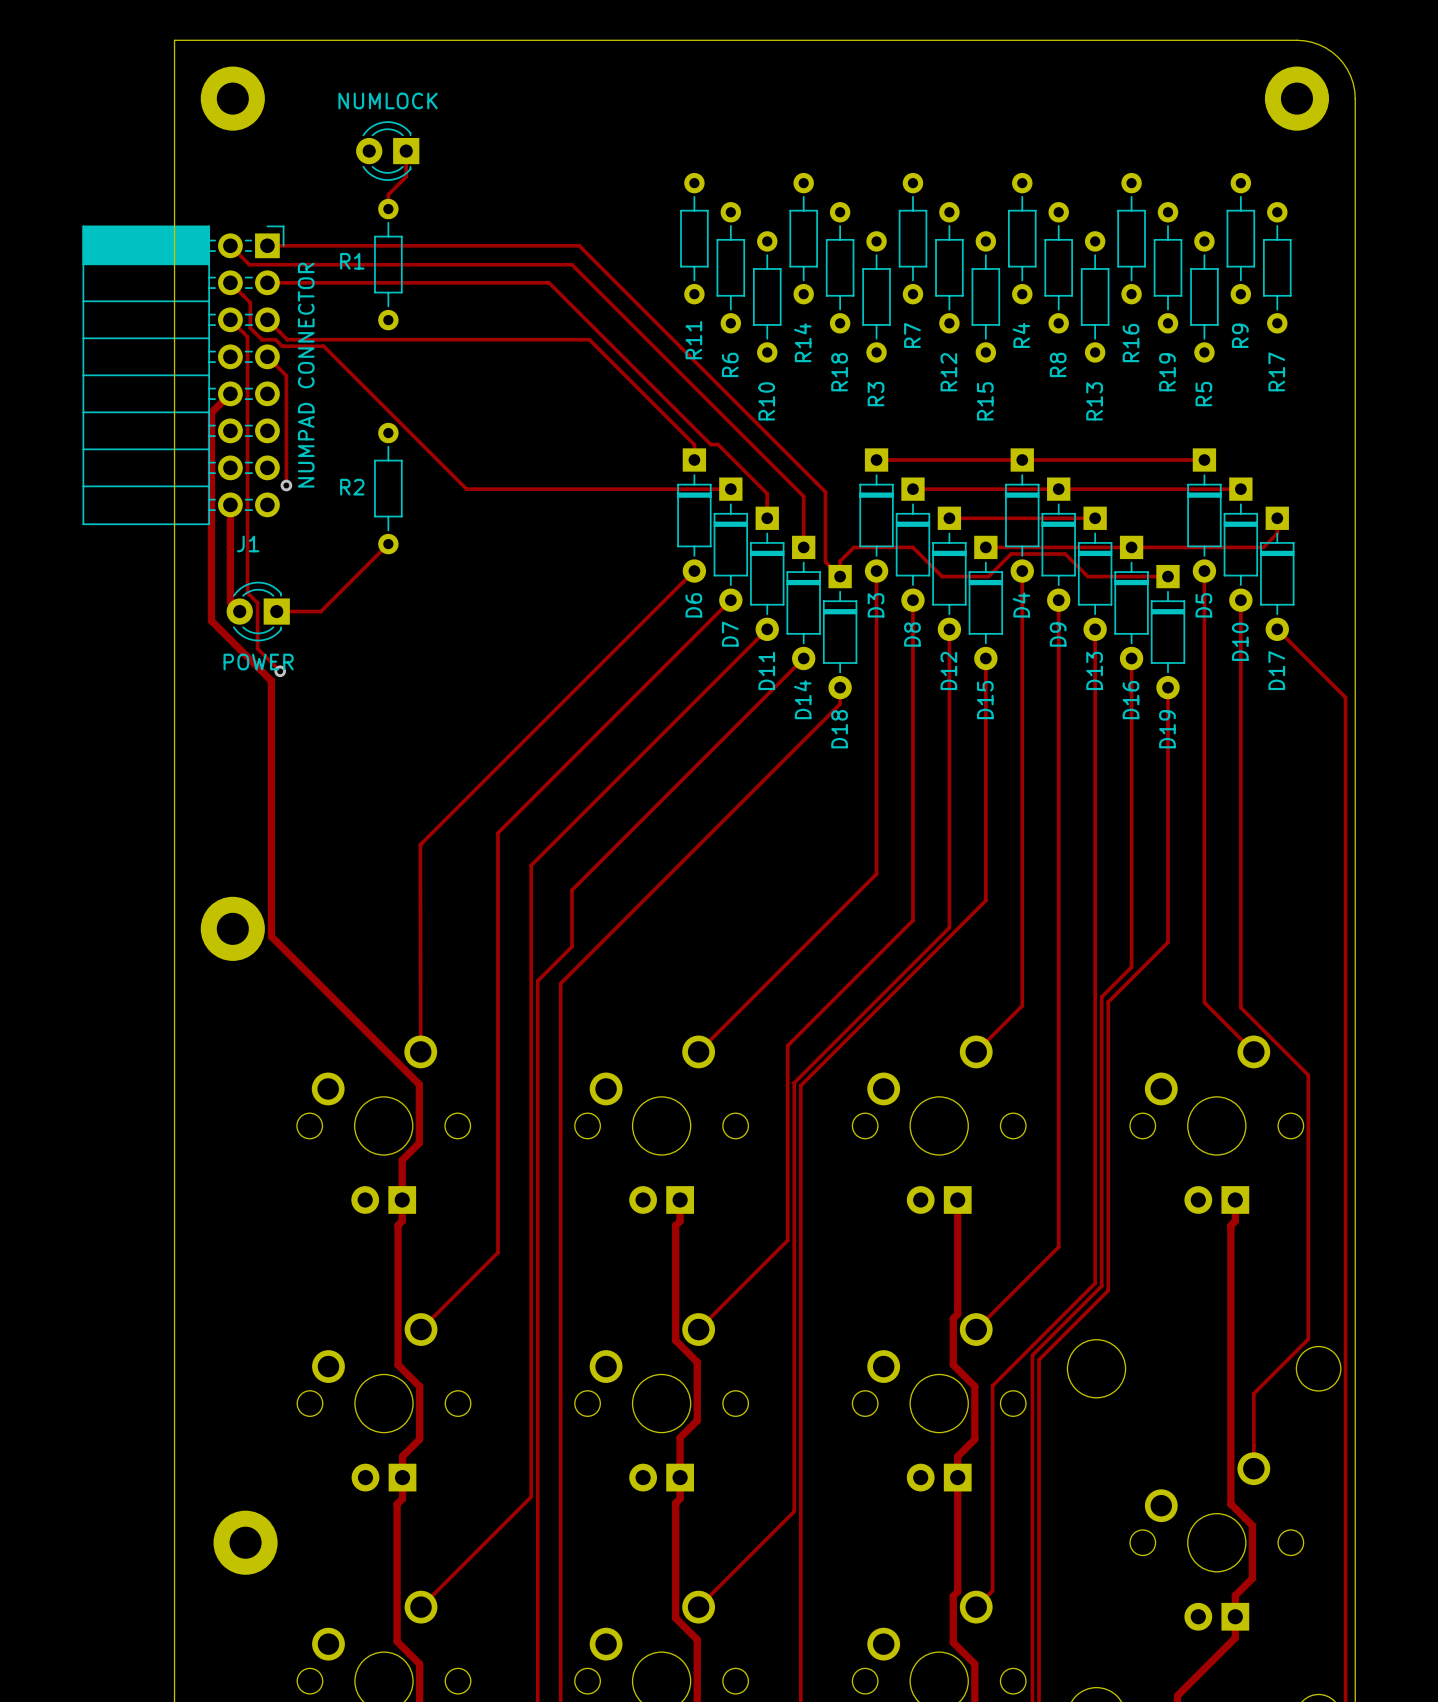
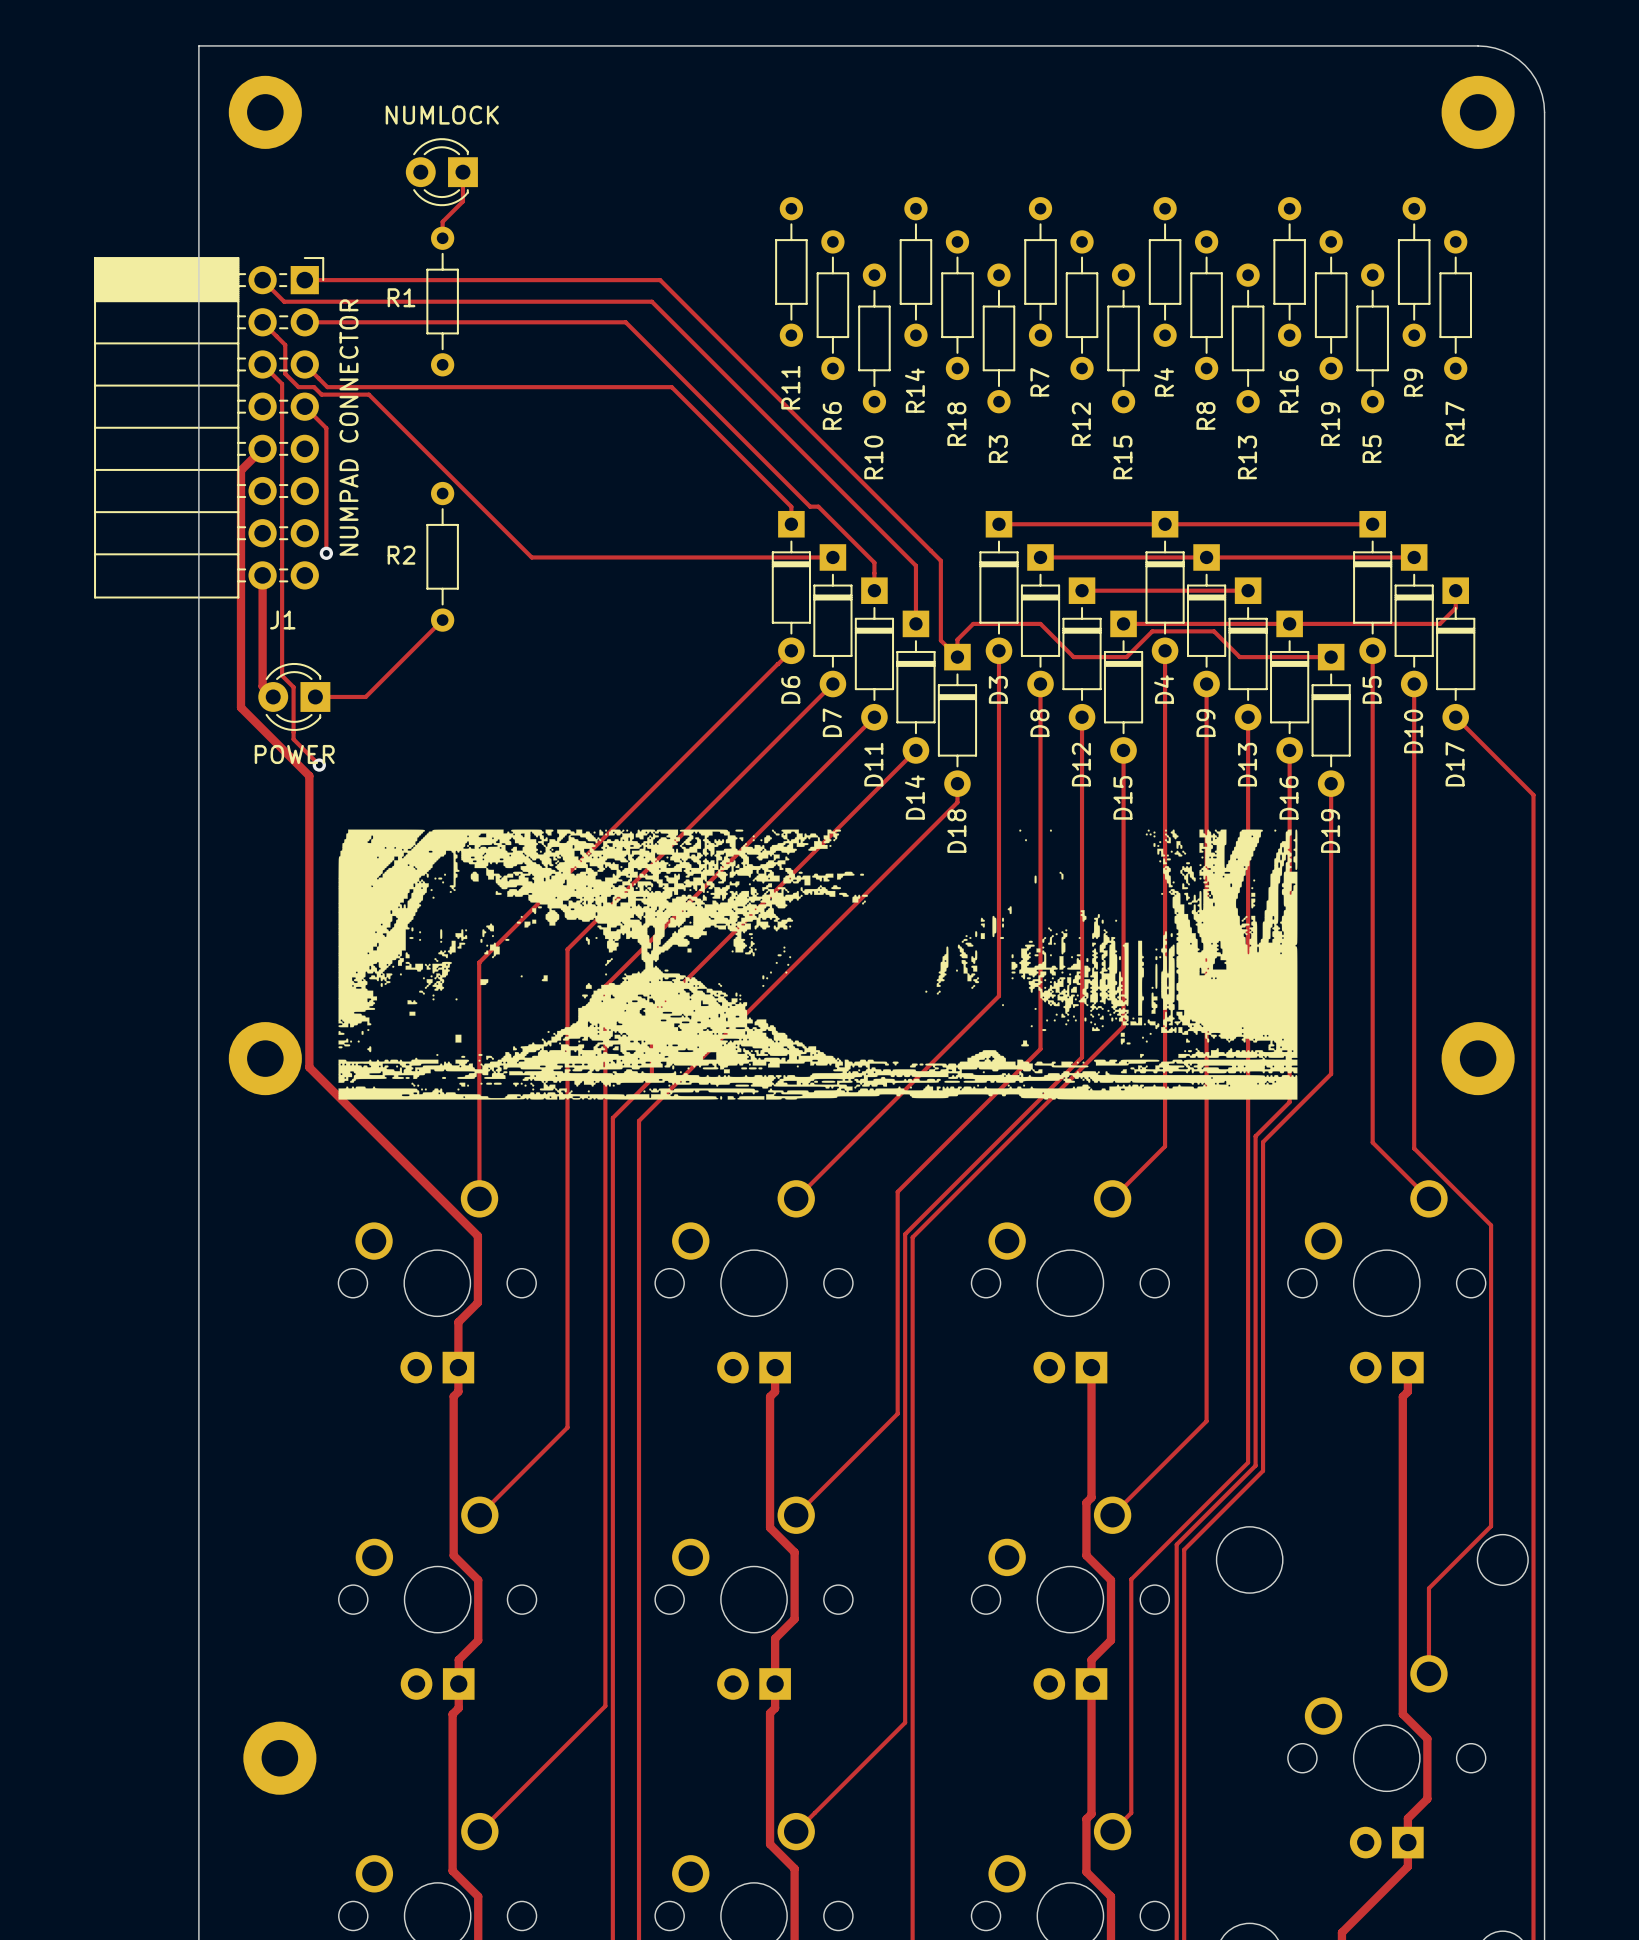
drawing: none -> [338, 829, 1298, 1100]
part: none -> (1478, 1058)

